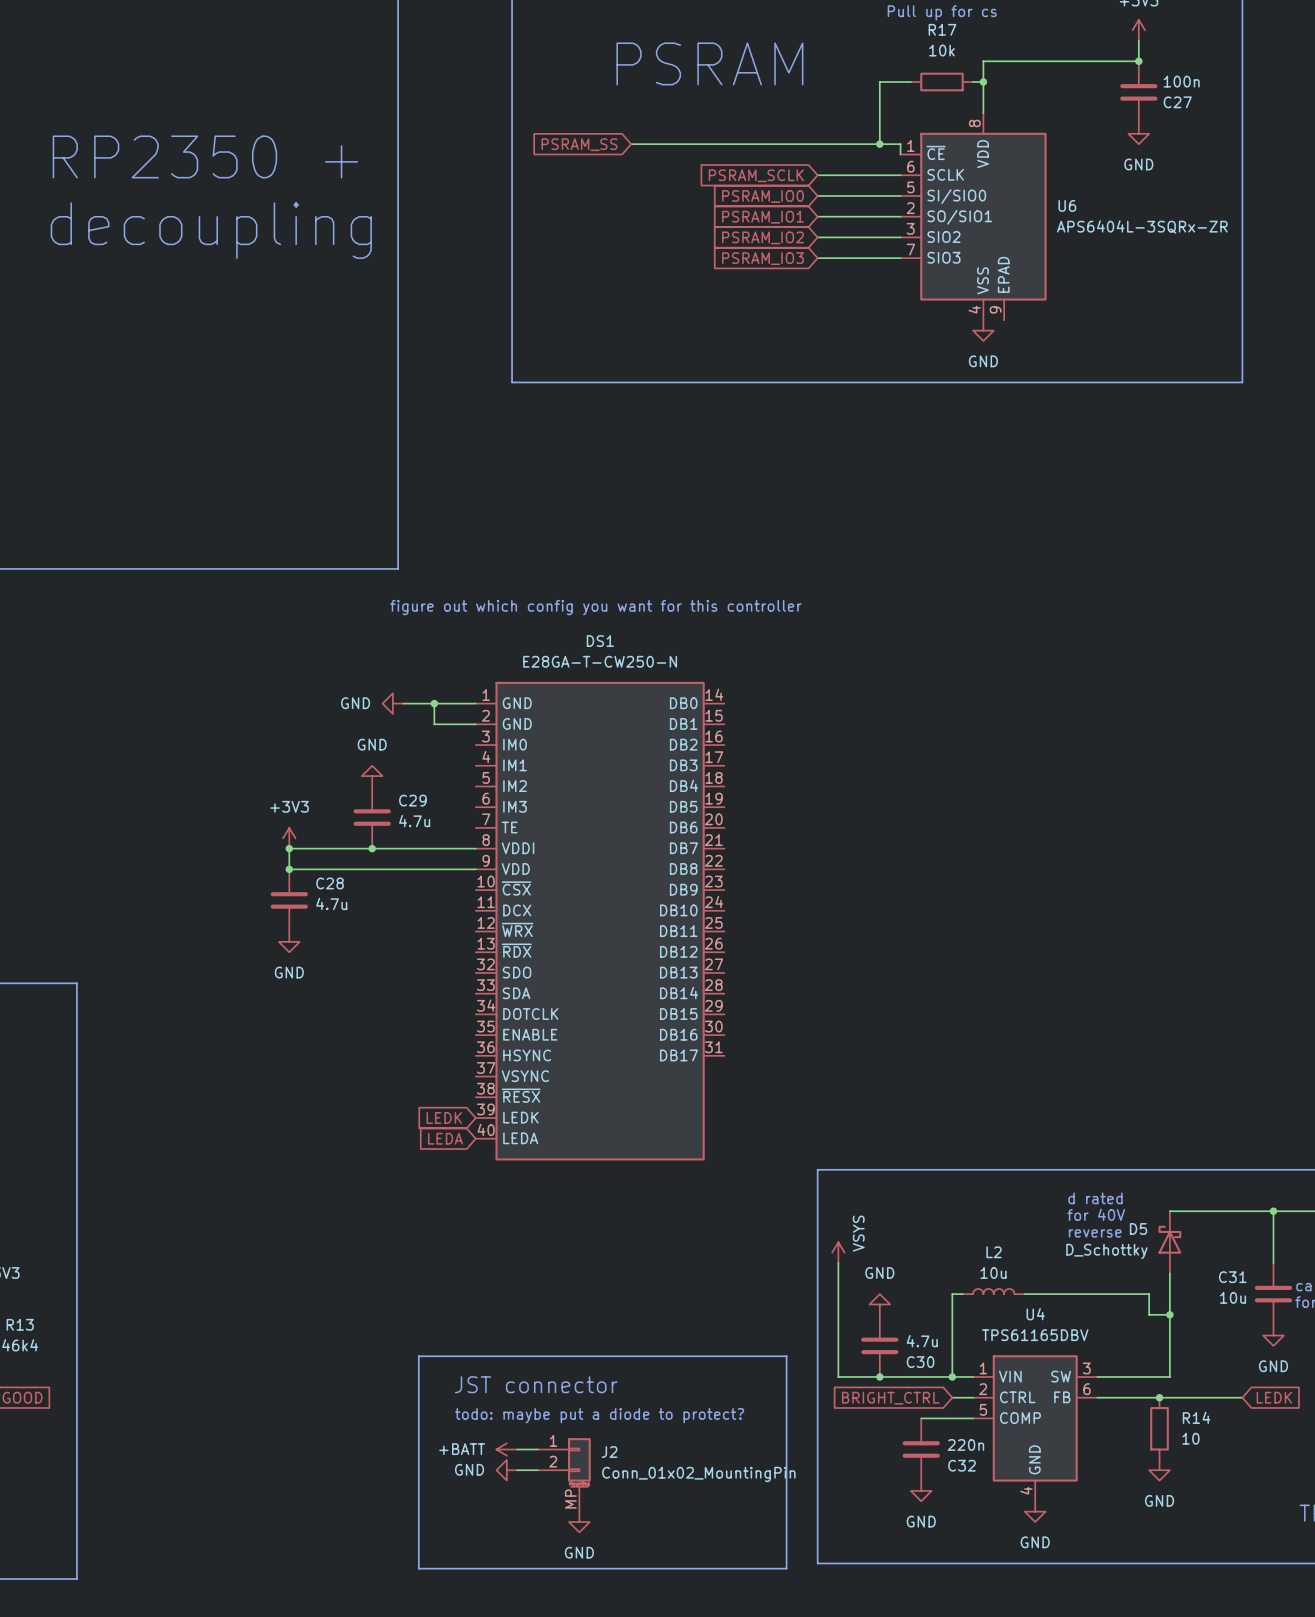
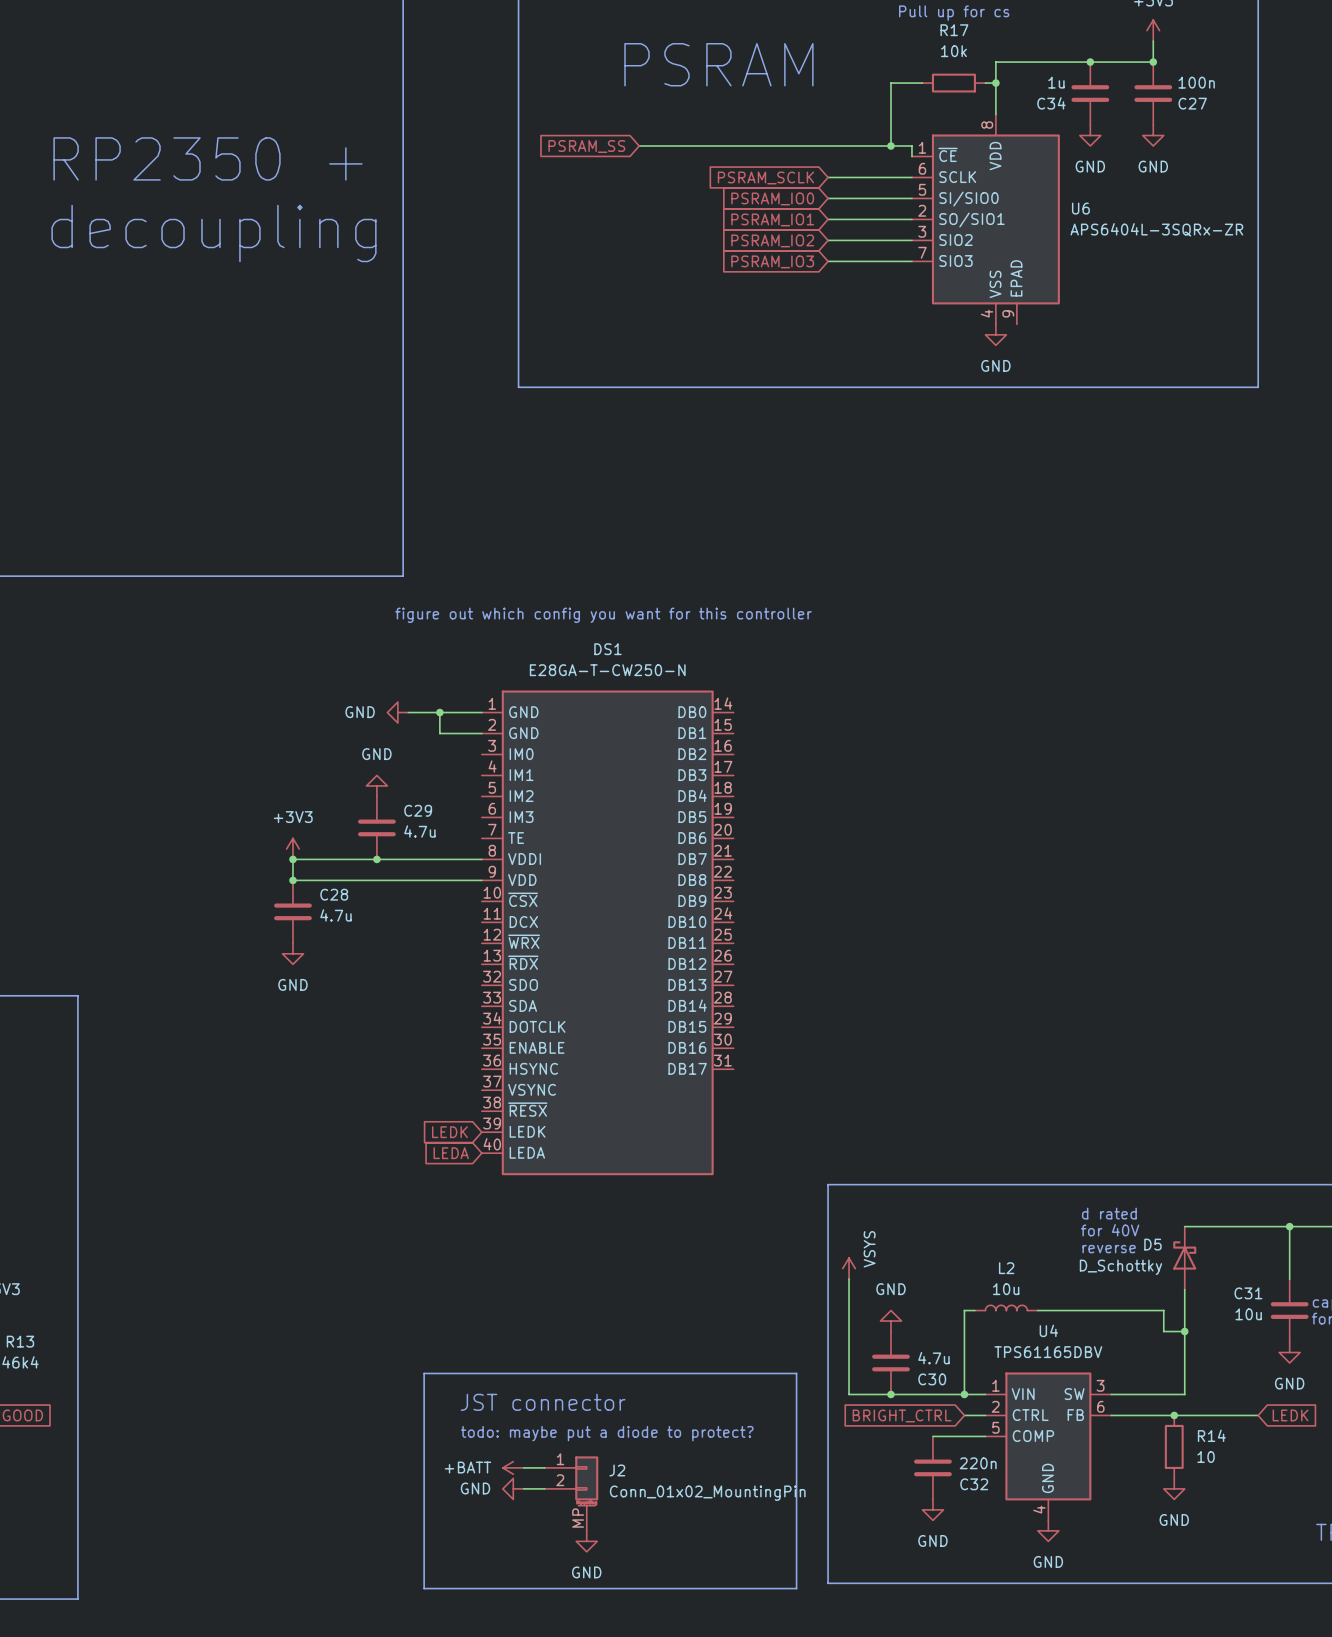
junction: none -> (1090, 62)
C34: none -> 1u (1090, 93)
power symbol: none -> GND (1090, 135)

